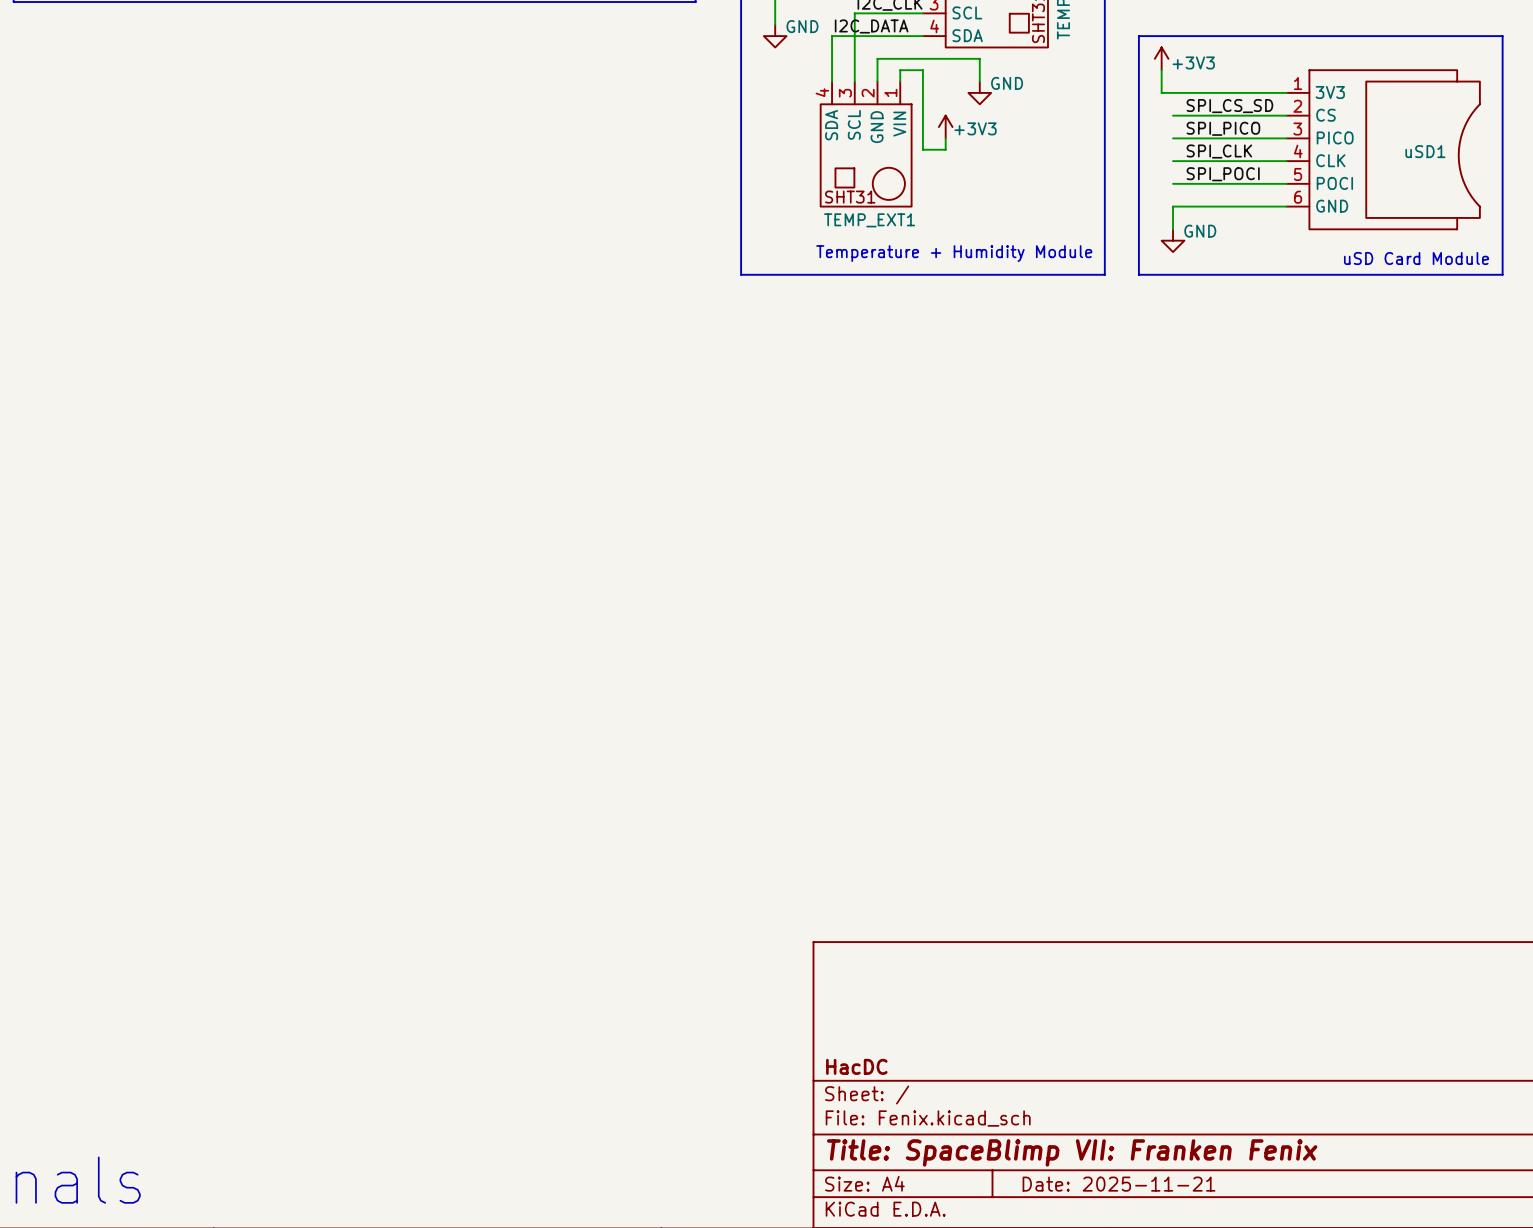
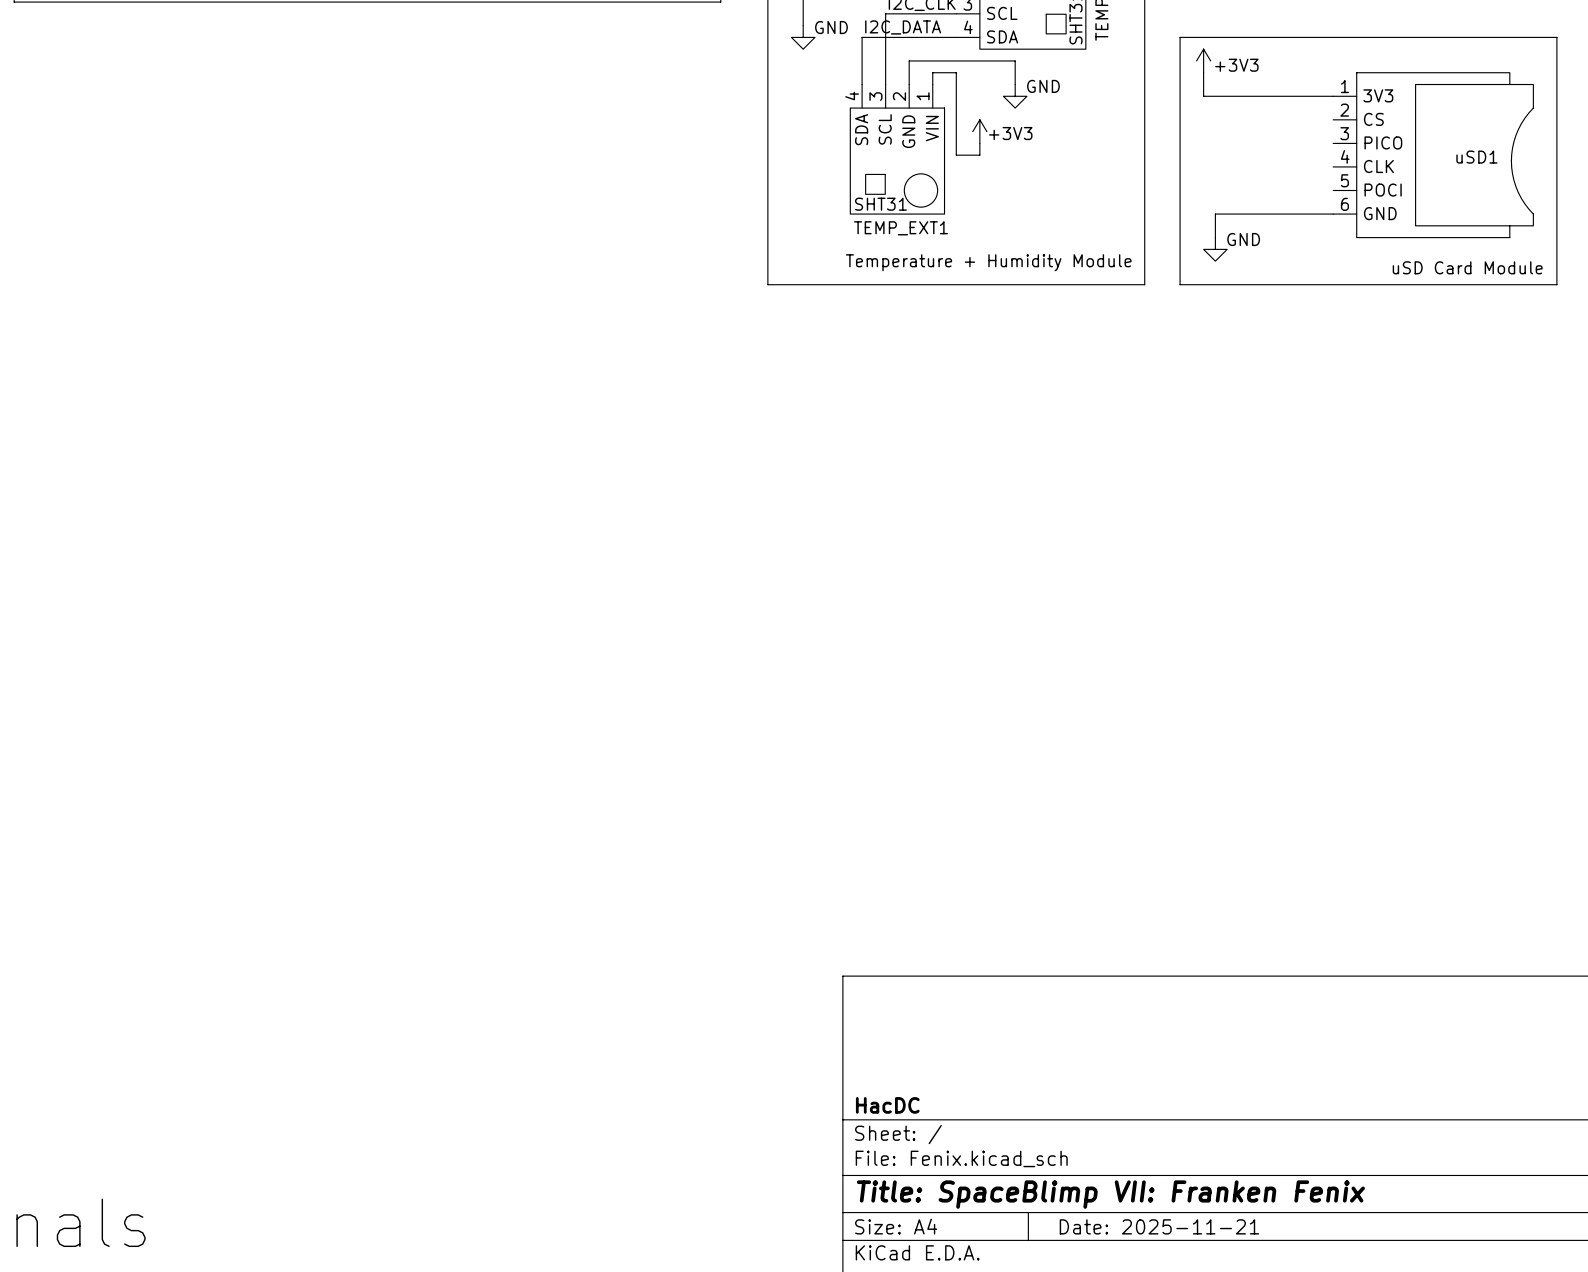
label: SPI_CS_SD (1229, 106) -> none
wire: (1173, 115) (1286, 115) -> none
label: SPI_PICO (1223, 128) -> none
wire: (1173, 138) (1286, 138) -> none
label: SPI_CLK (1219, 151) -> none
wire: (1173, 161) (1286, 161) -> none
label: SPI_POCI (1223, 174) -> none
wire: (1173, 183) (1286, 183) -> none

